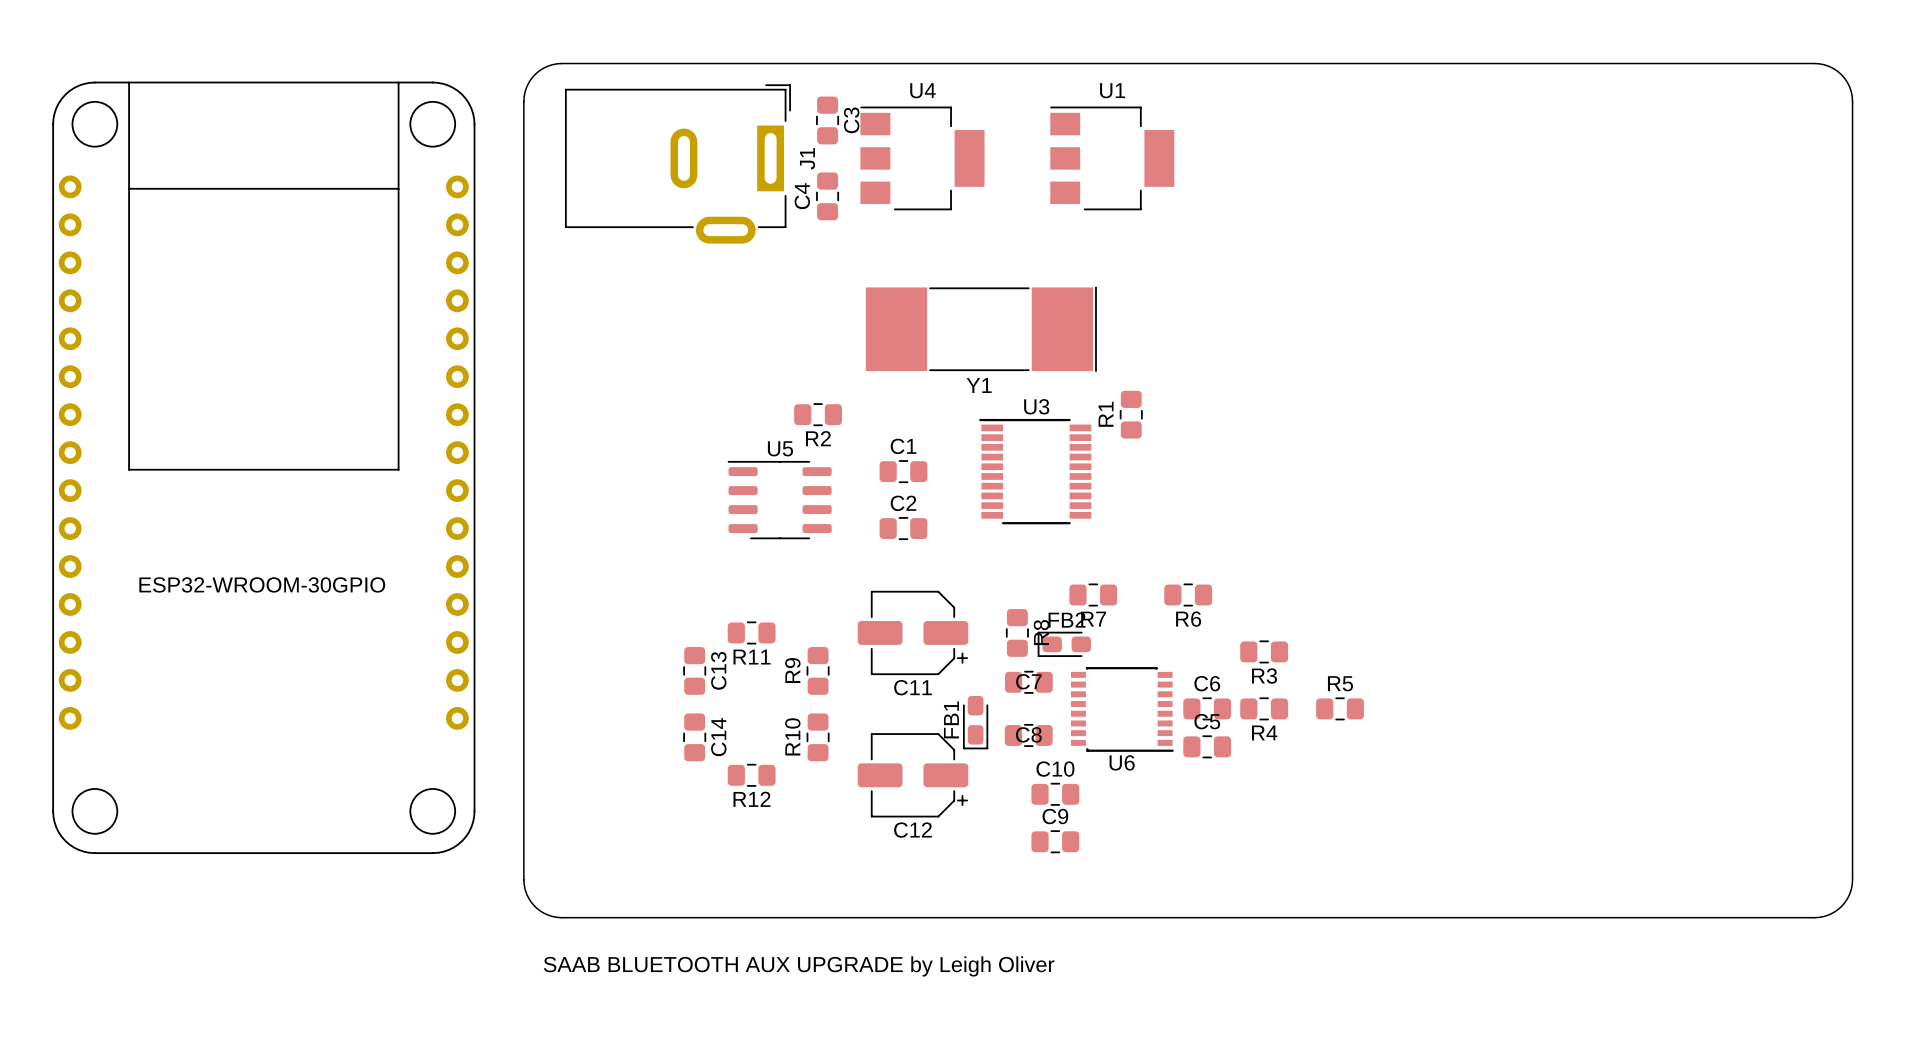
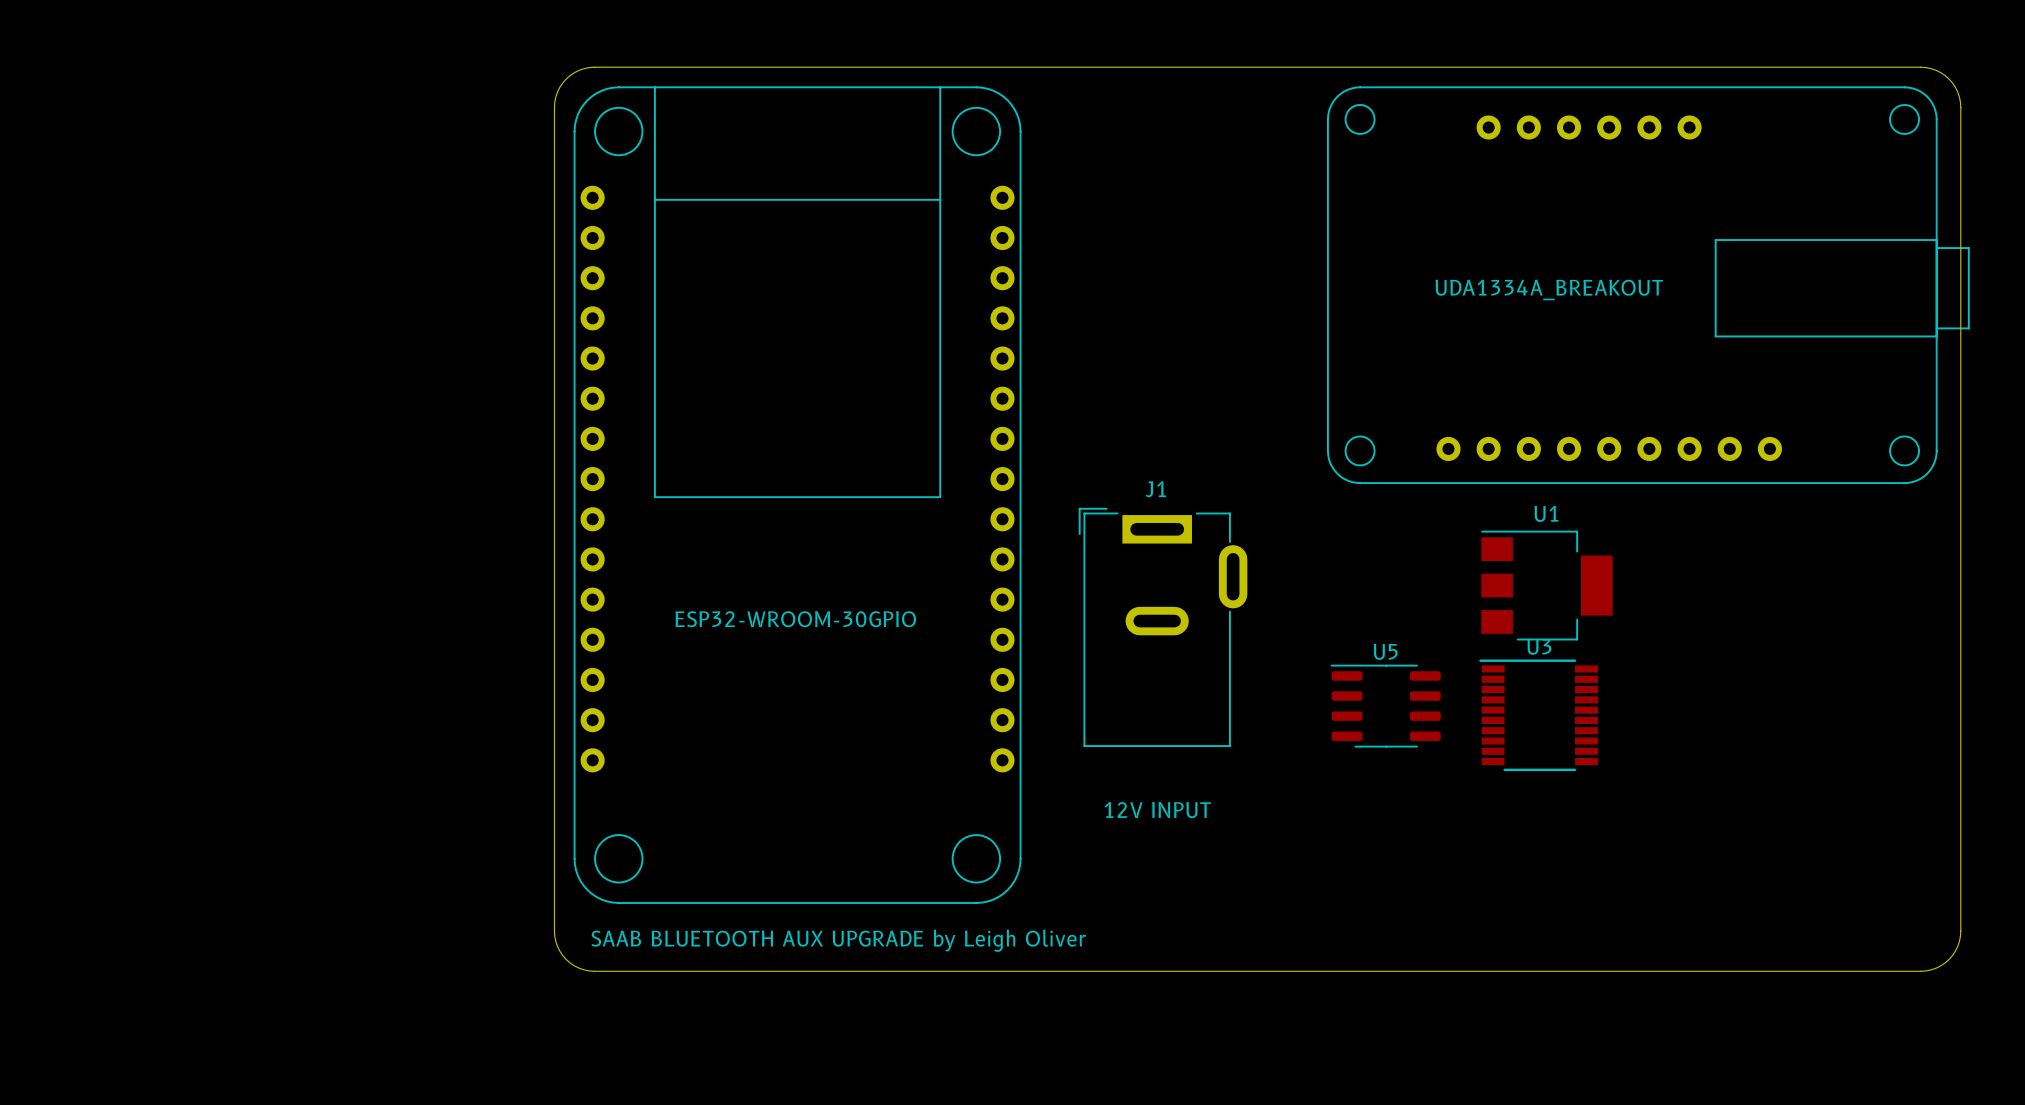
C3: (827, 120) -> none
U4: (922, 158) -> none
U1 position: (1112, 158) -> (1546, 585)
J1 rotation: 0° (677, 163) -> 90° counterclockwise (1163, 627)
J1 position: (677, 163) -> (1163, 627)
C4: (827, 196) -> none
part: none -> UDA1334A_BREAKOUT (1648, 285)
Y1: (981, 329) -> none
R2: (818, 414) -> none
R1: (1131, 414) -> none
part: ESP32-WROOM-30GPIO (263, 467) -> none
part: none -> ESP32-WROOM-30GPIO (797, 495)
C1: (903, 471) -> none
U3 position: (1035, 471) -> (1538, 715)
U5 position: (779, 500) -> (1385, 706)
C2: (903, 528) -> none
R7: (1093, 594) -> none
R6: (1188, 594) -> none
R11: (751, 632) -> none
C11: (912, 632) -> none
R8: (1017, 632) -> none
FB2: (1064, 644) -> none
R3: (1264, 651) -> none
C13: (694, 670) -> none
R9: (818, 670) -> none
C7: (1028, 682) -> none
C6: (1207, 708) -> none
R4: (1264, 708) -> none
R5: (1340, 708) -> none
U6: (1122, 709) -> none
FB1: (975, 722) -> none
C8: (1028, 735) -> none
C14: (694, 737) -> none
R10: (818, 737) -> none
C5: (1207, 746) -> none
text: none -> 12V INPUT (1157, 810)
R12: (751, 775) -> none
C12: (912, 775) -> none
C10: (1055, 794) -> none
C9: (1055, 841) -> none
text position: SAAB BLUETOOTH AUX UPGRADE by Leigh Oliver (799, 966) -> SAAB BLUETOOTH AUX UPGRADE by Leigh Oliver (838, 940)

